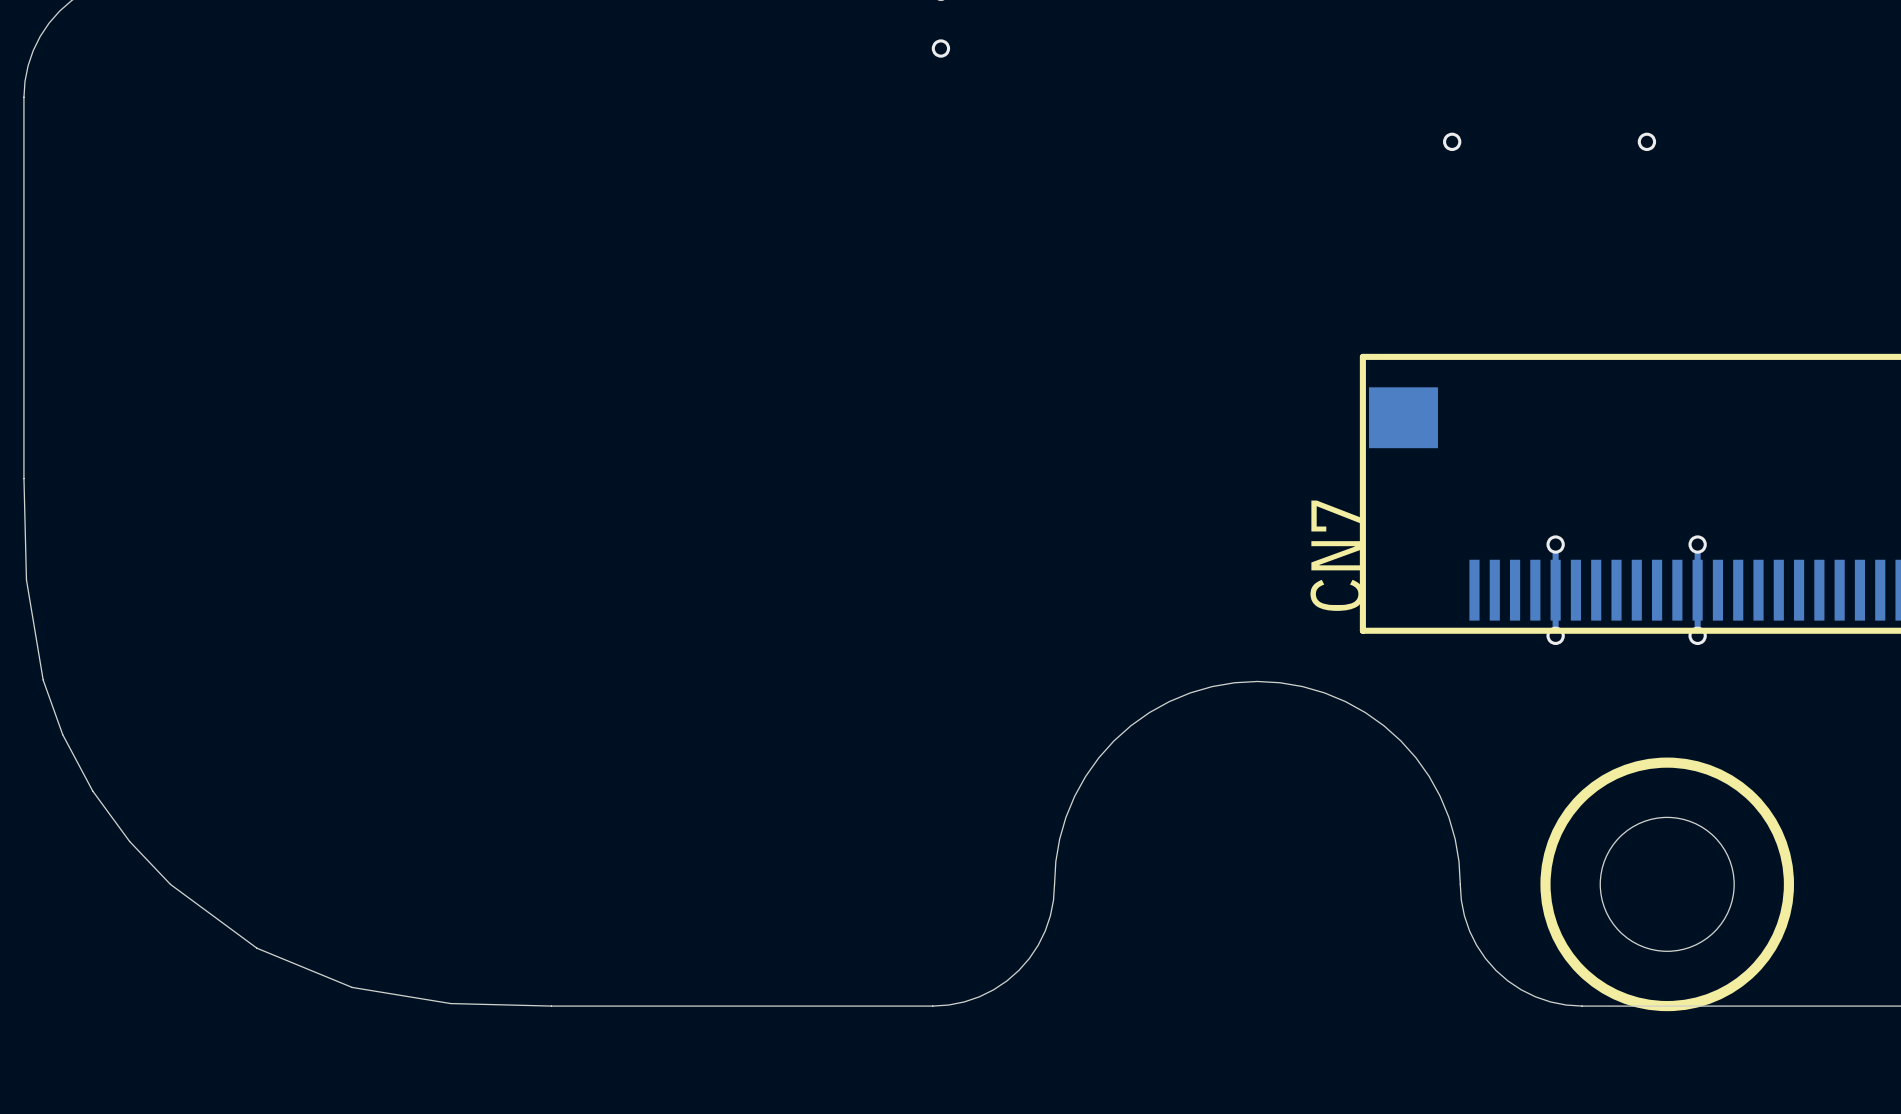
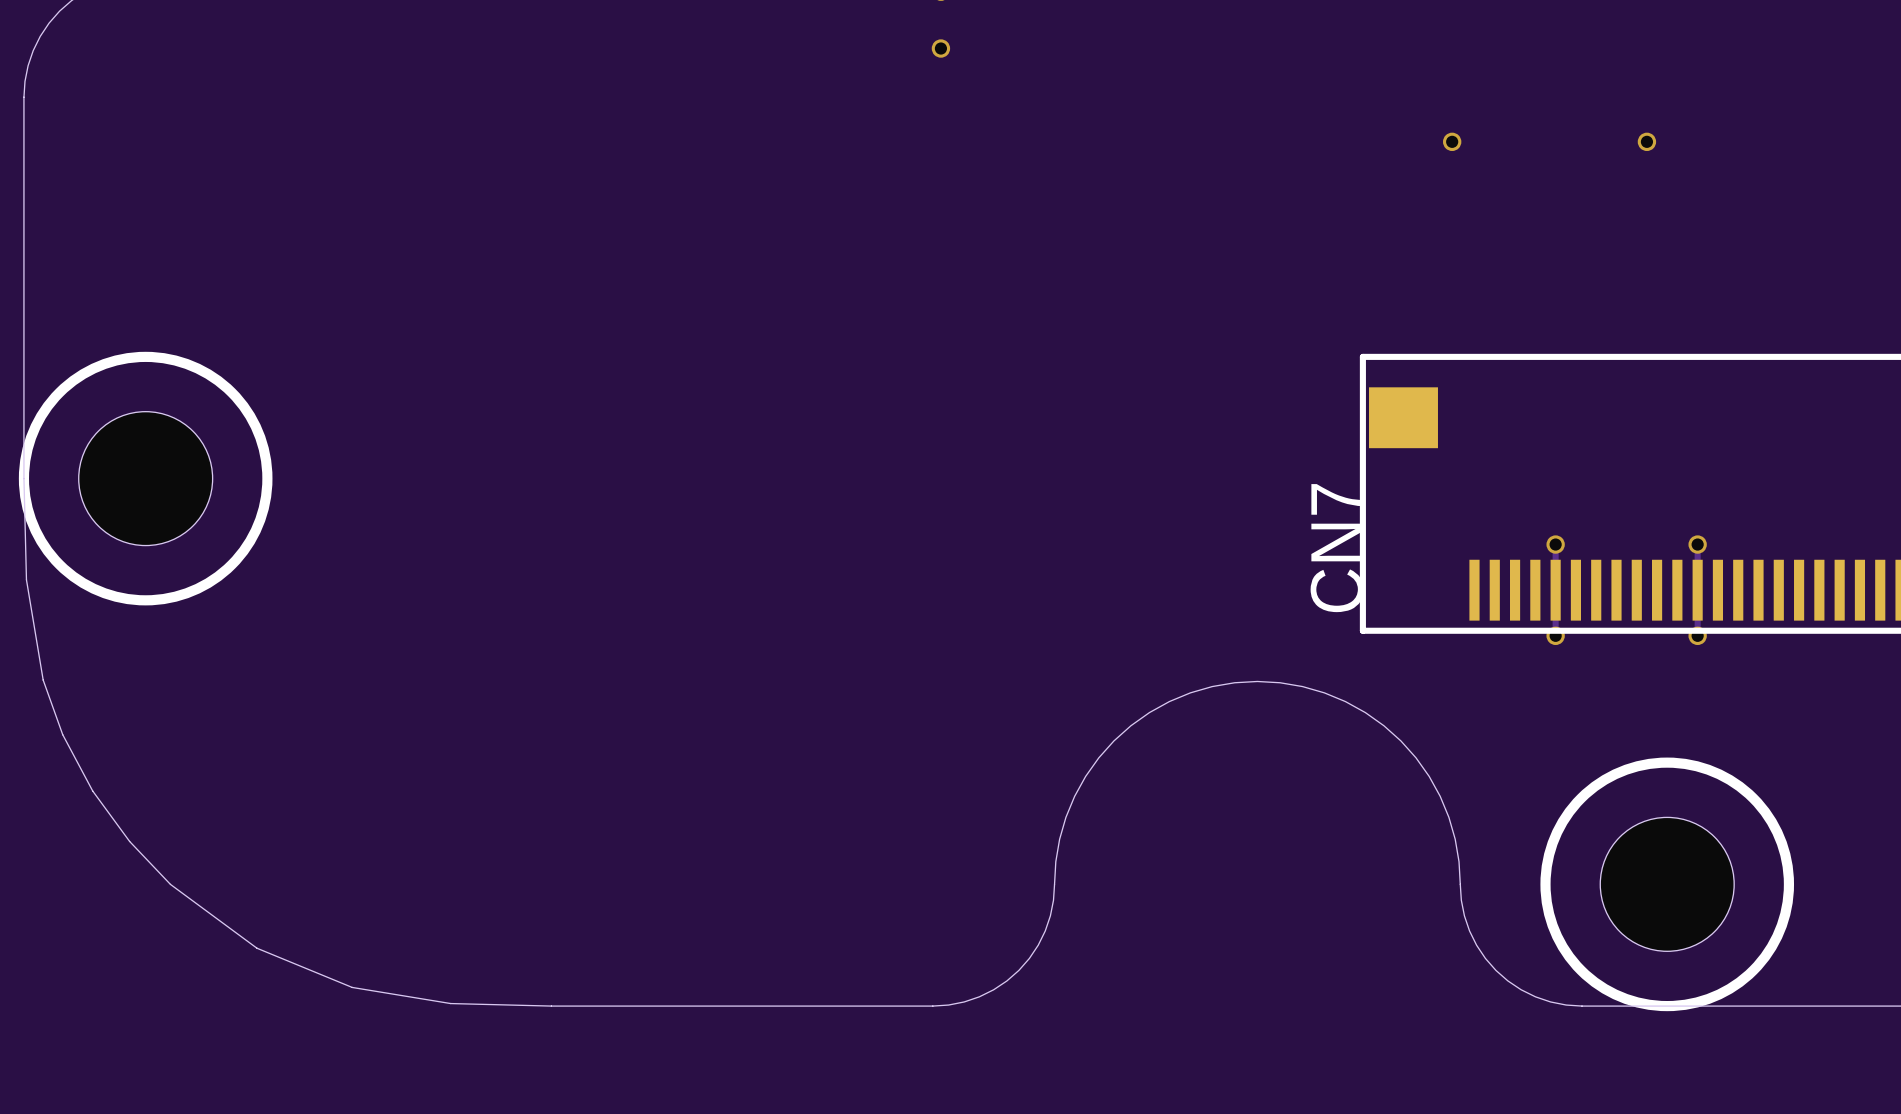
part: none -> (145, 478)

